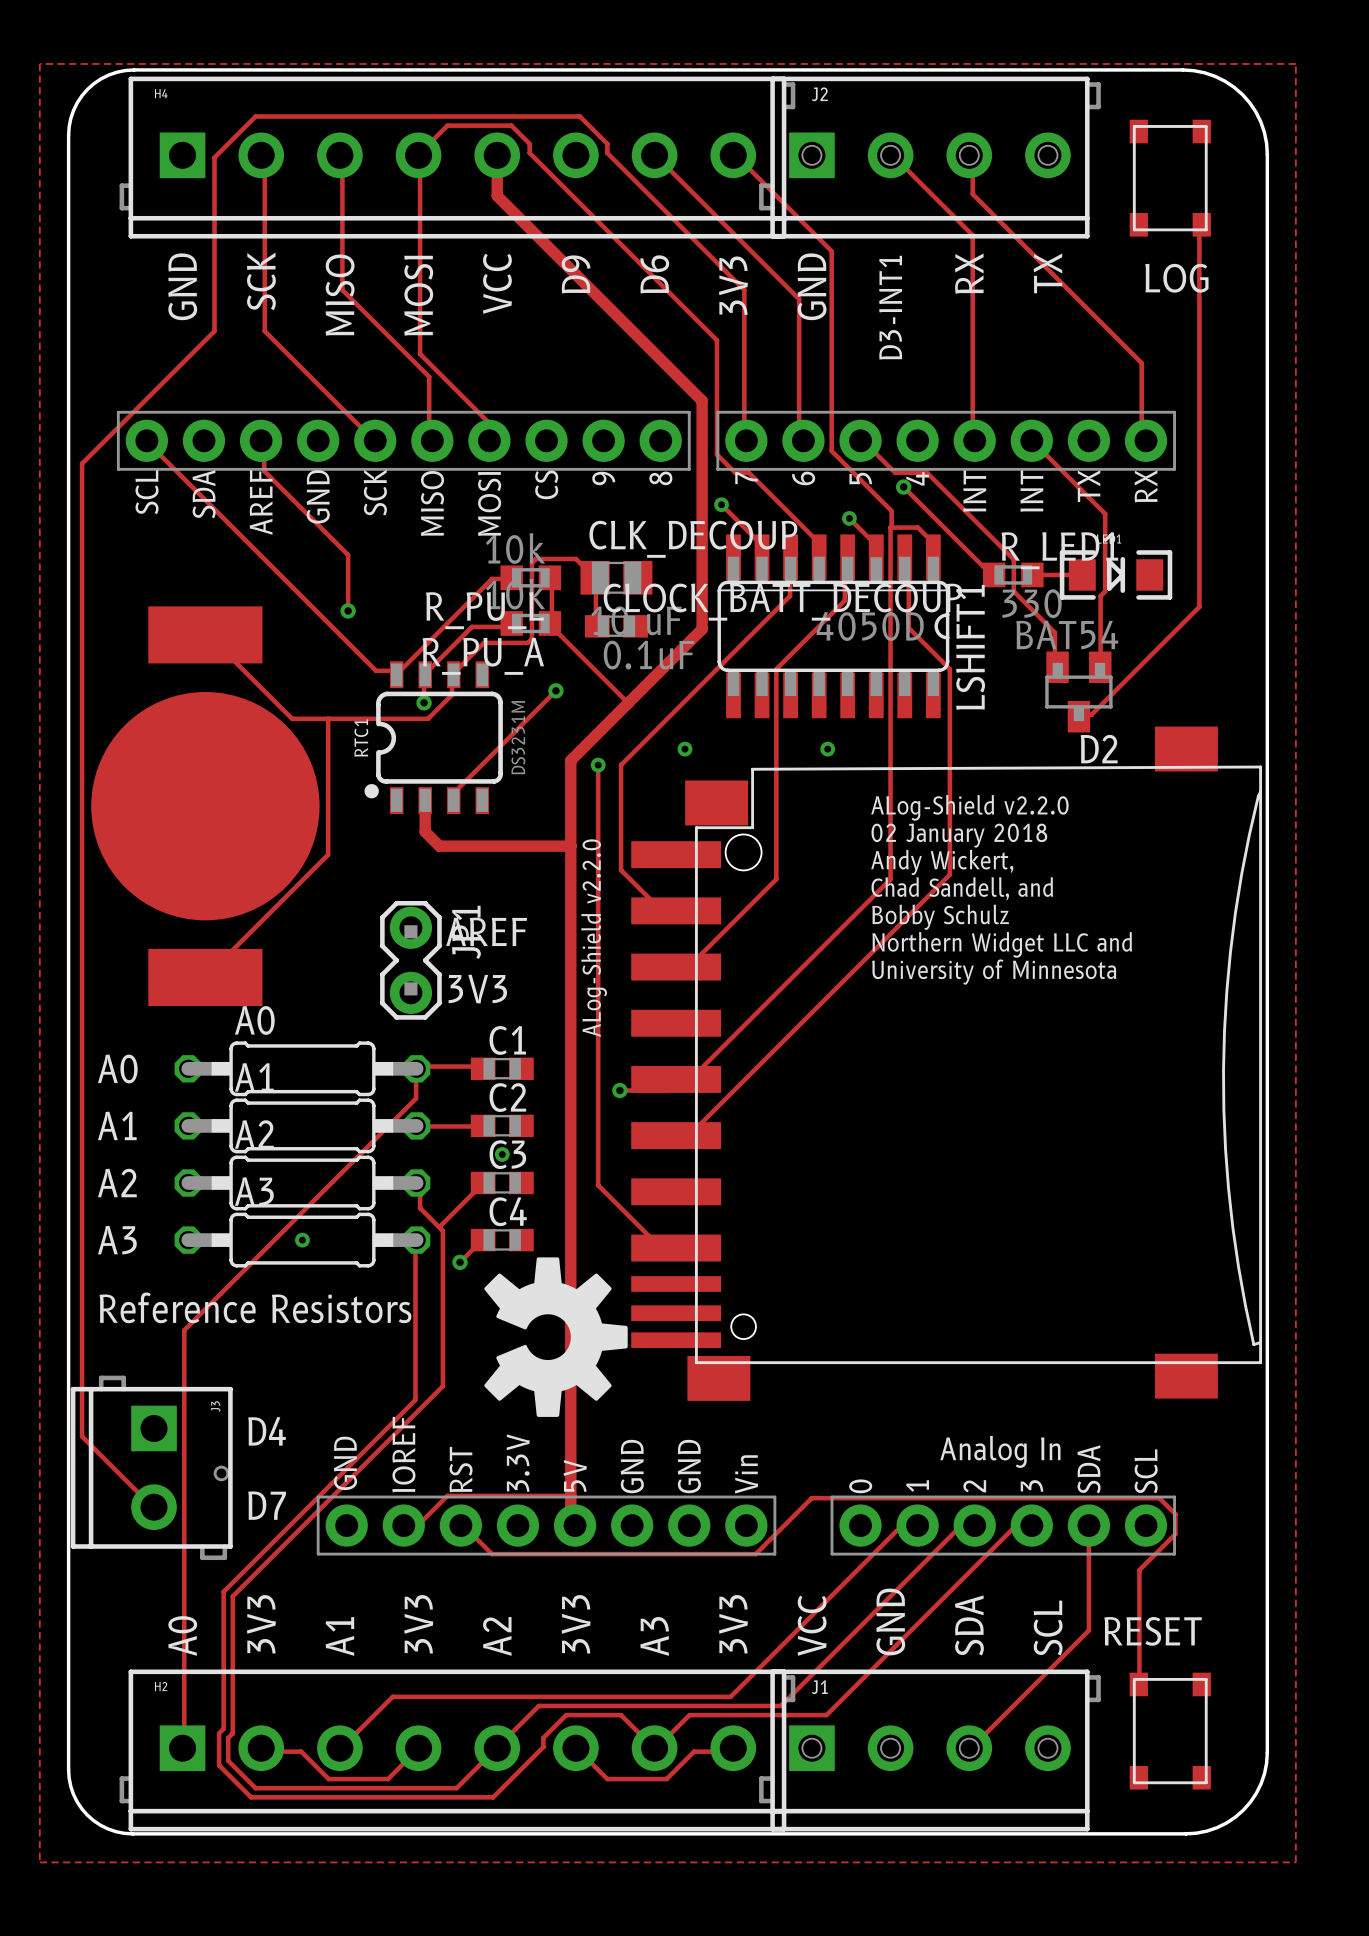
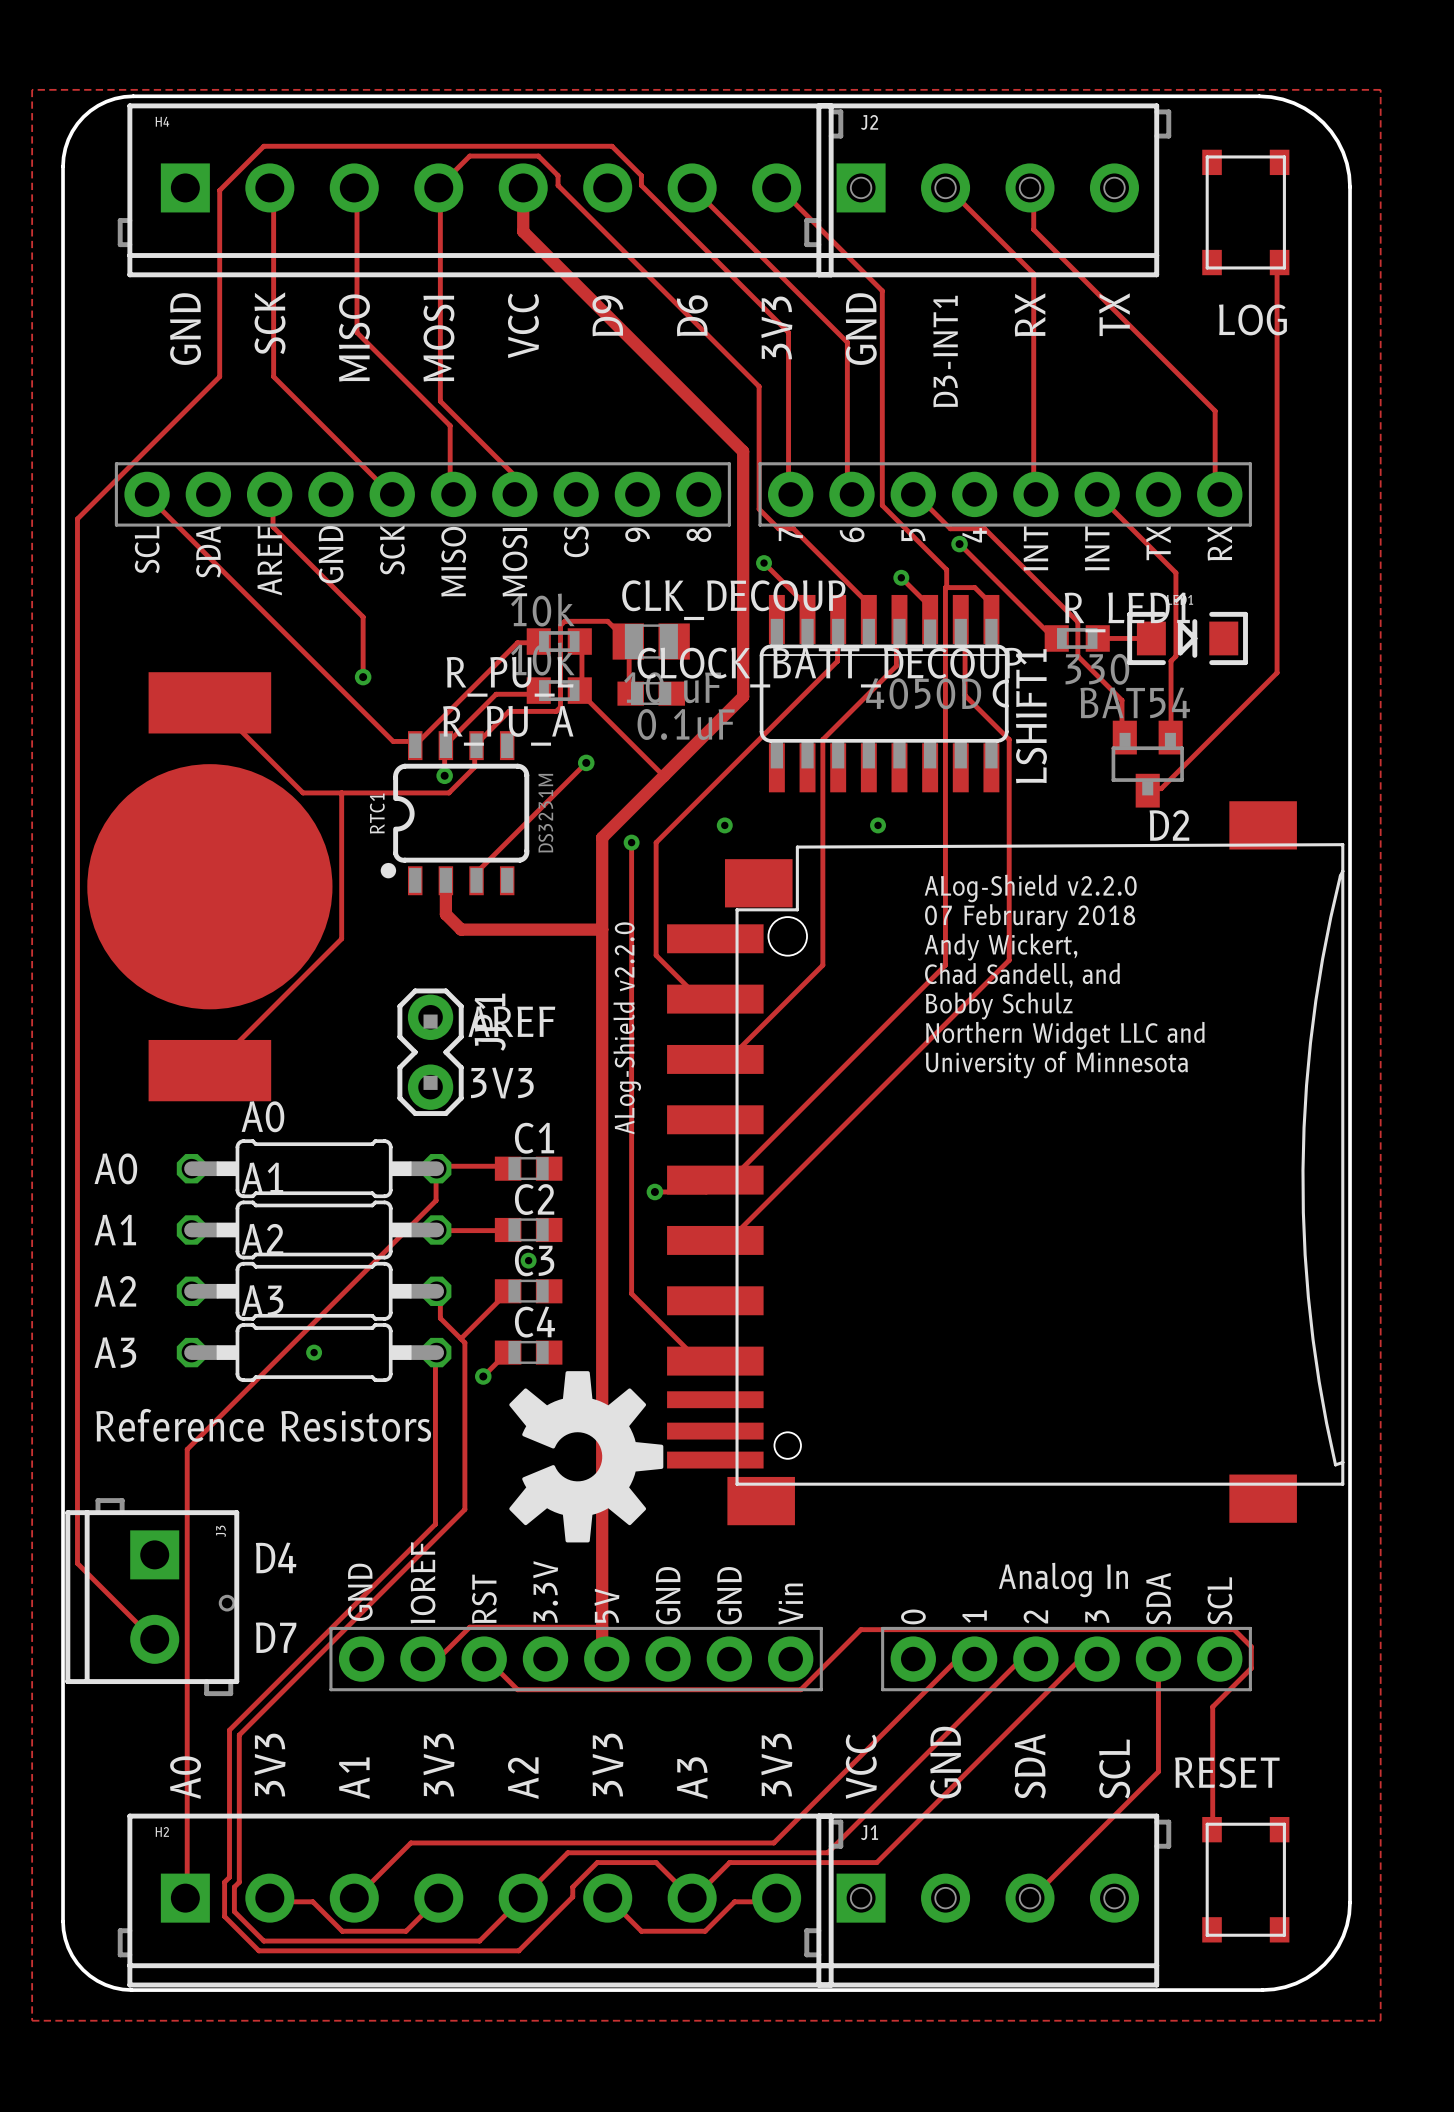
text: 02 January 2018 (959, 835) -> 07 Februrary 2018 (1030, 917)

